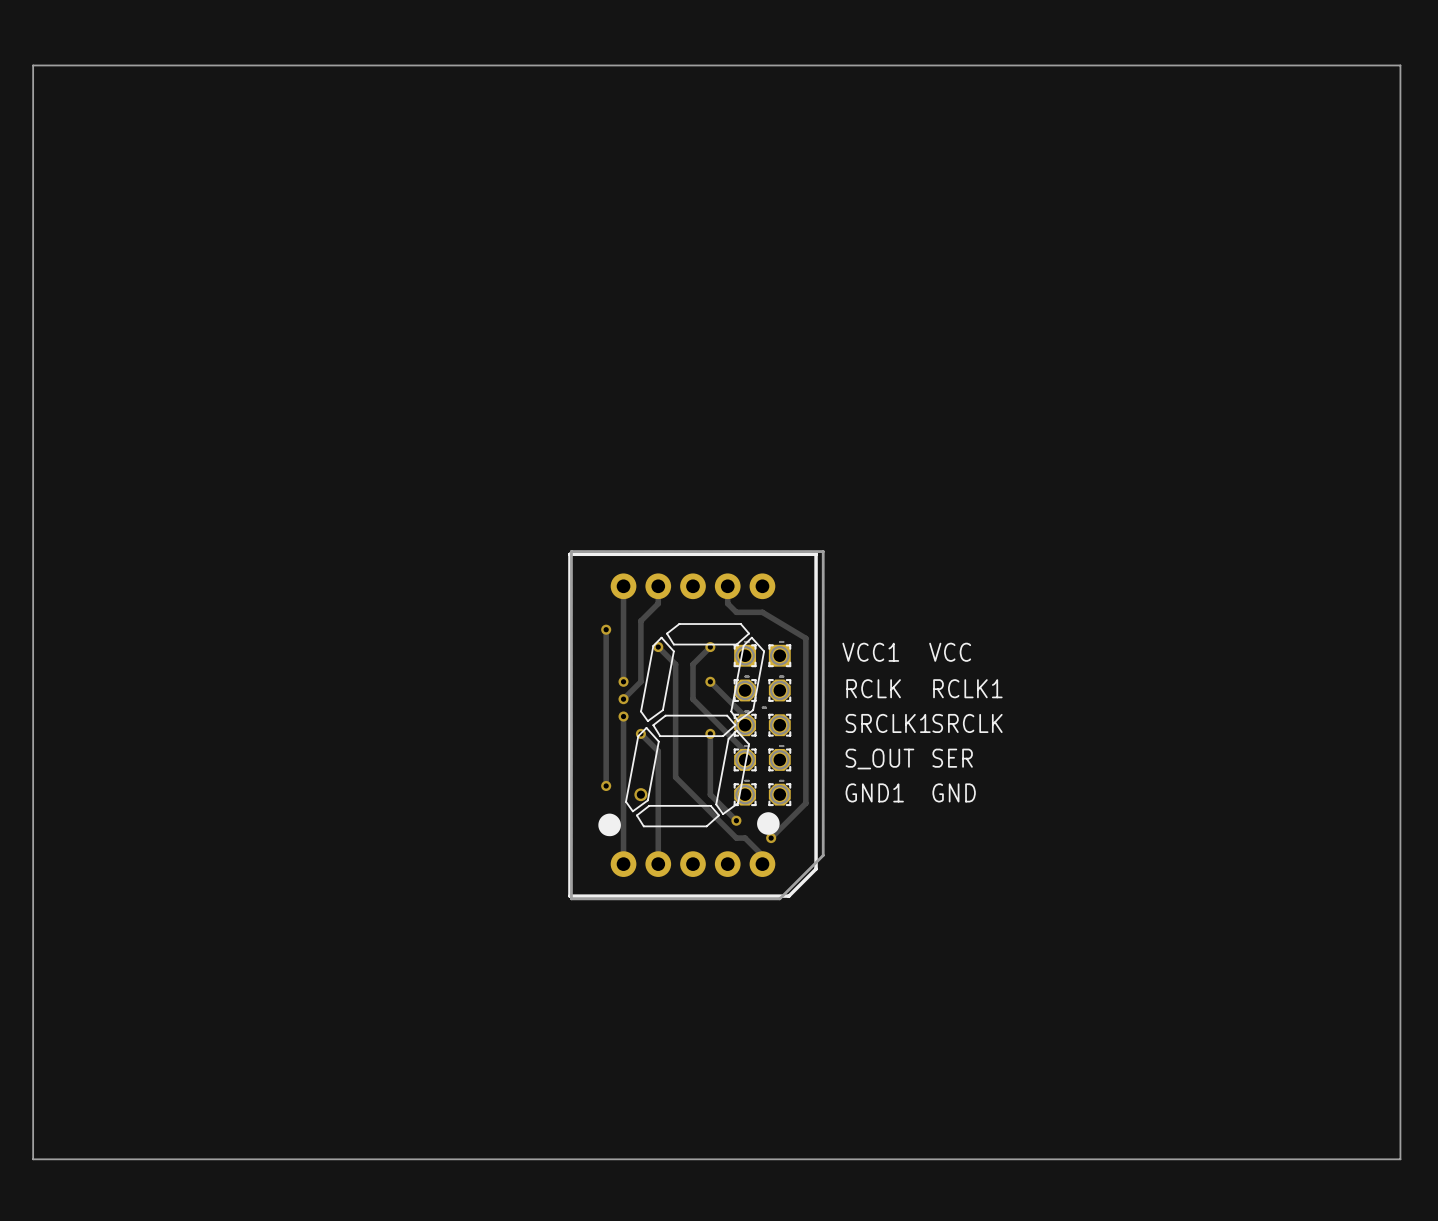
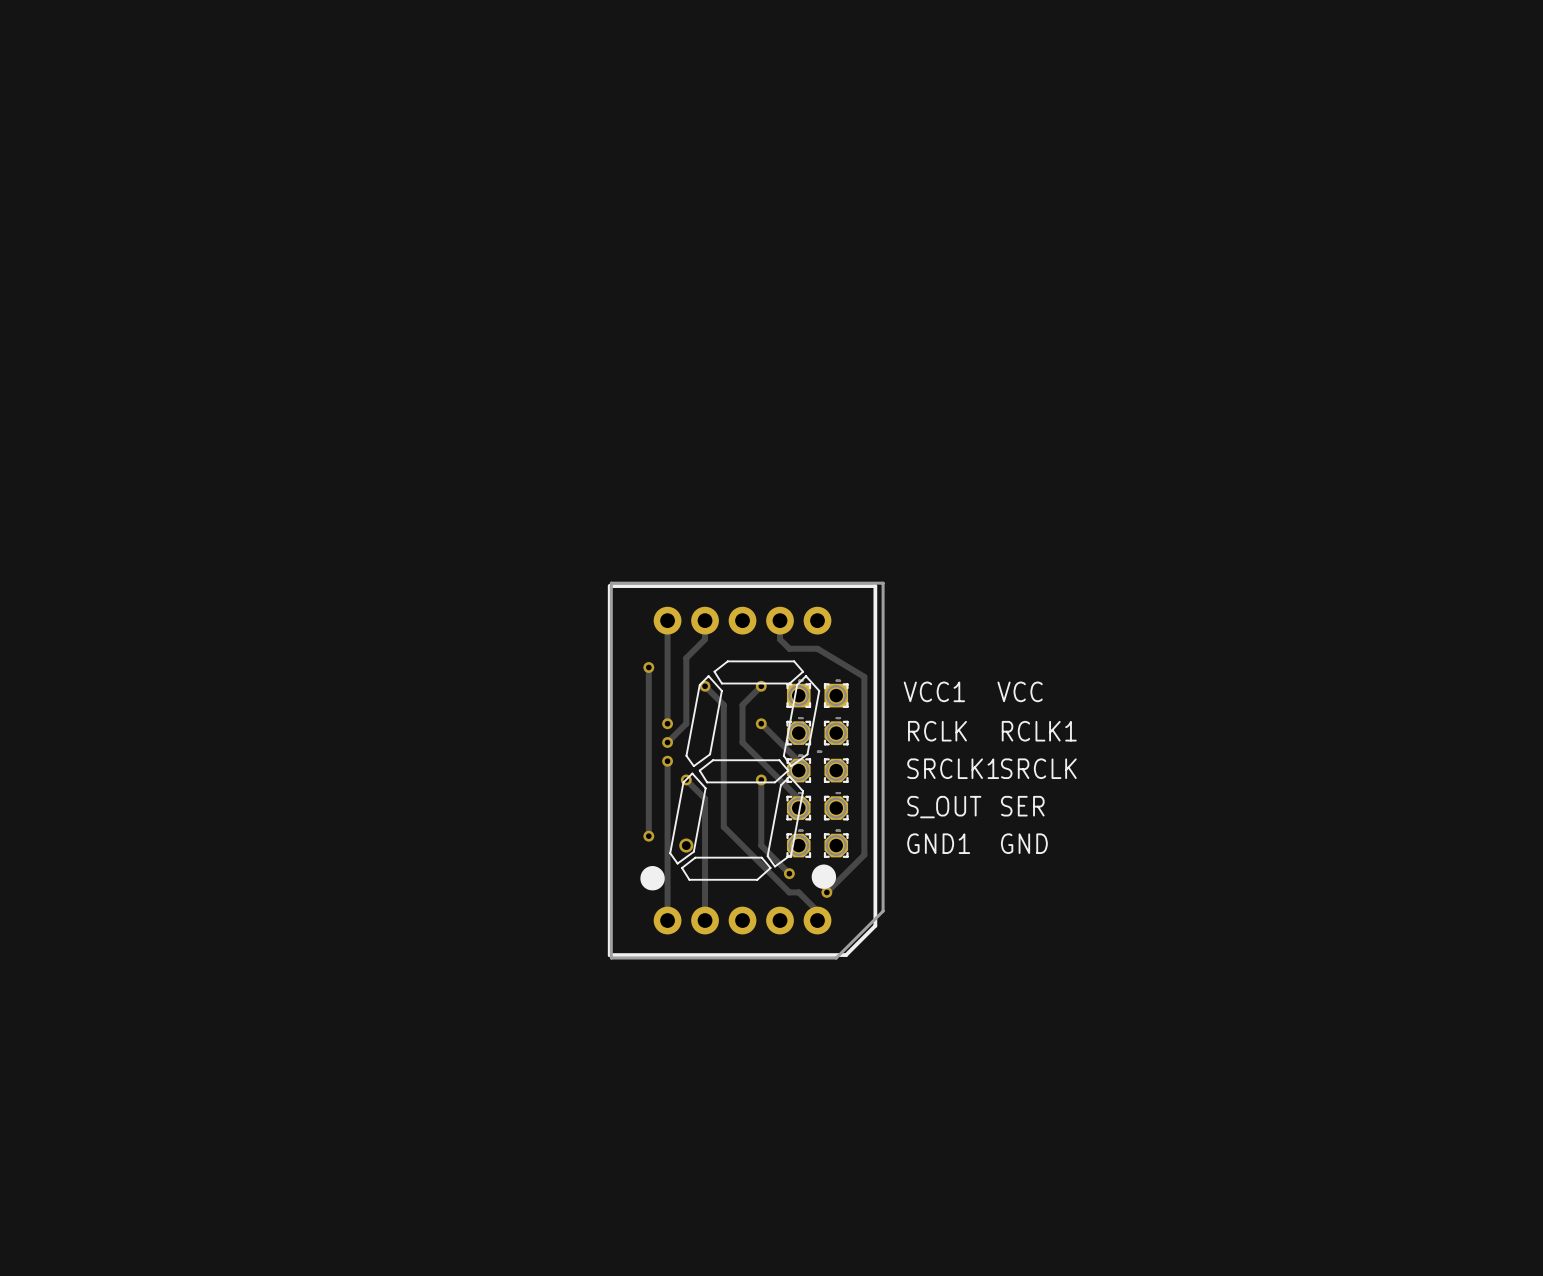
board edge: (33, 65) (1400, 65) (1400, 1159) (33, 1159) (33, 65) -> none

